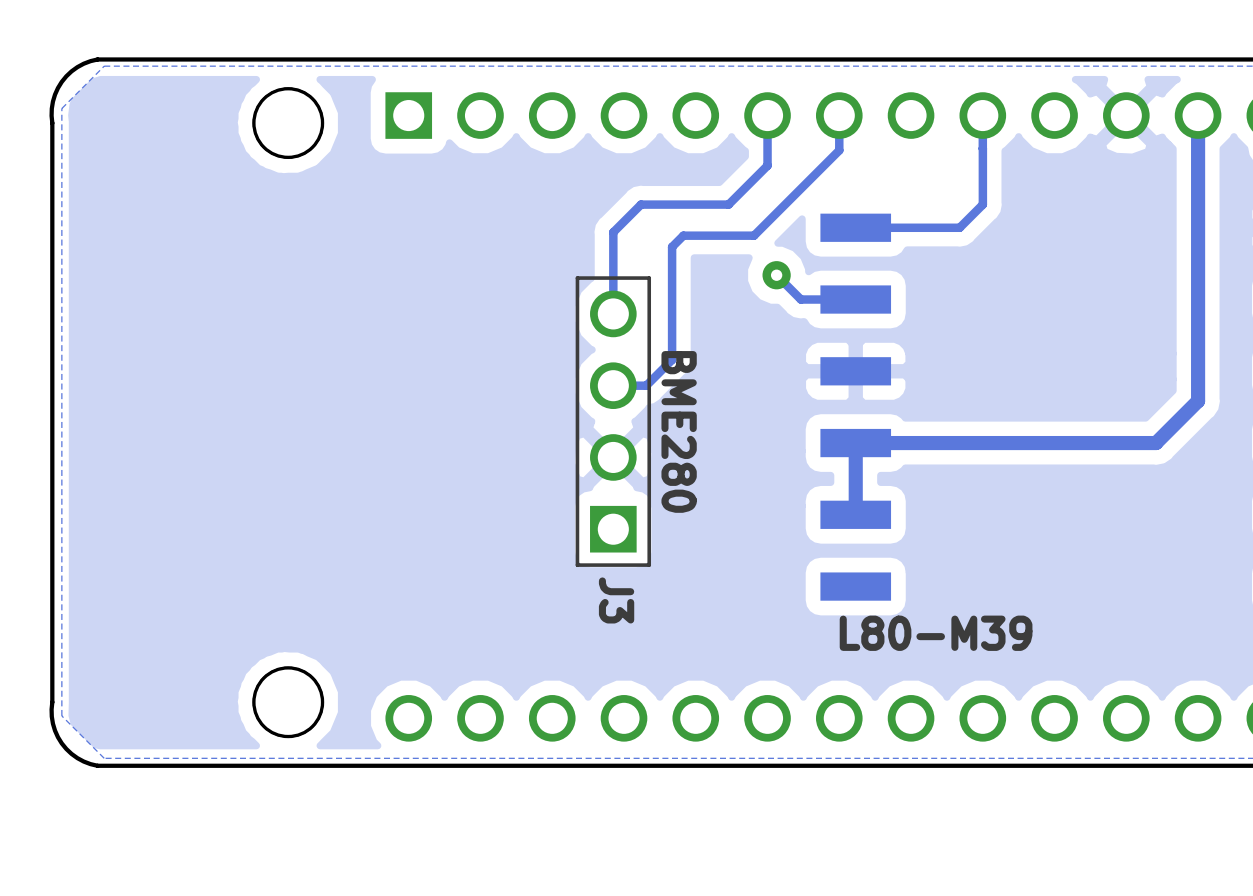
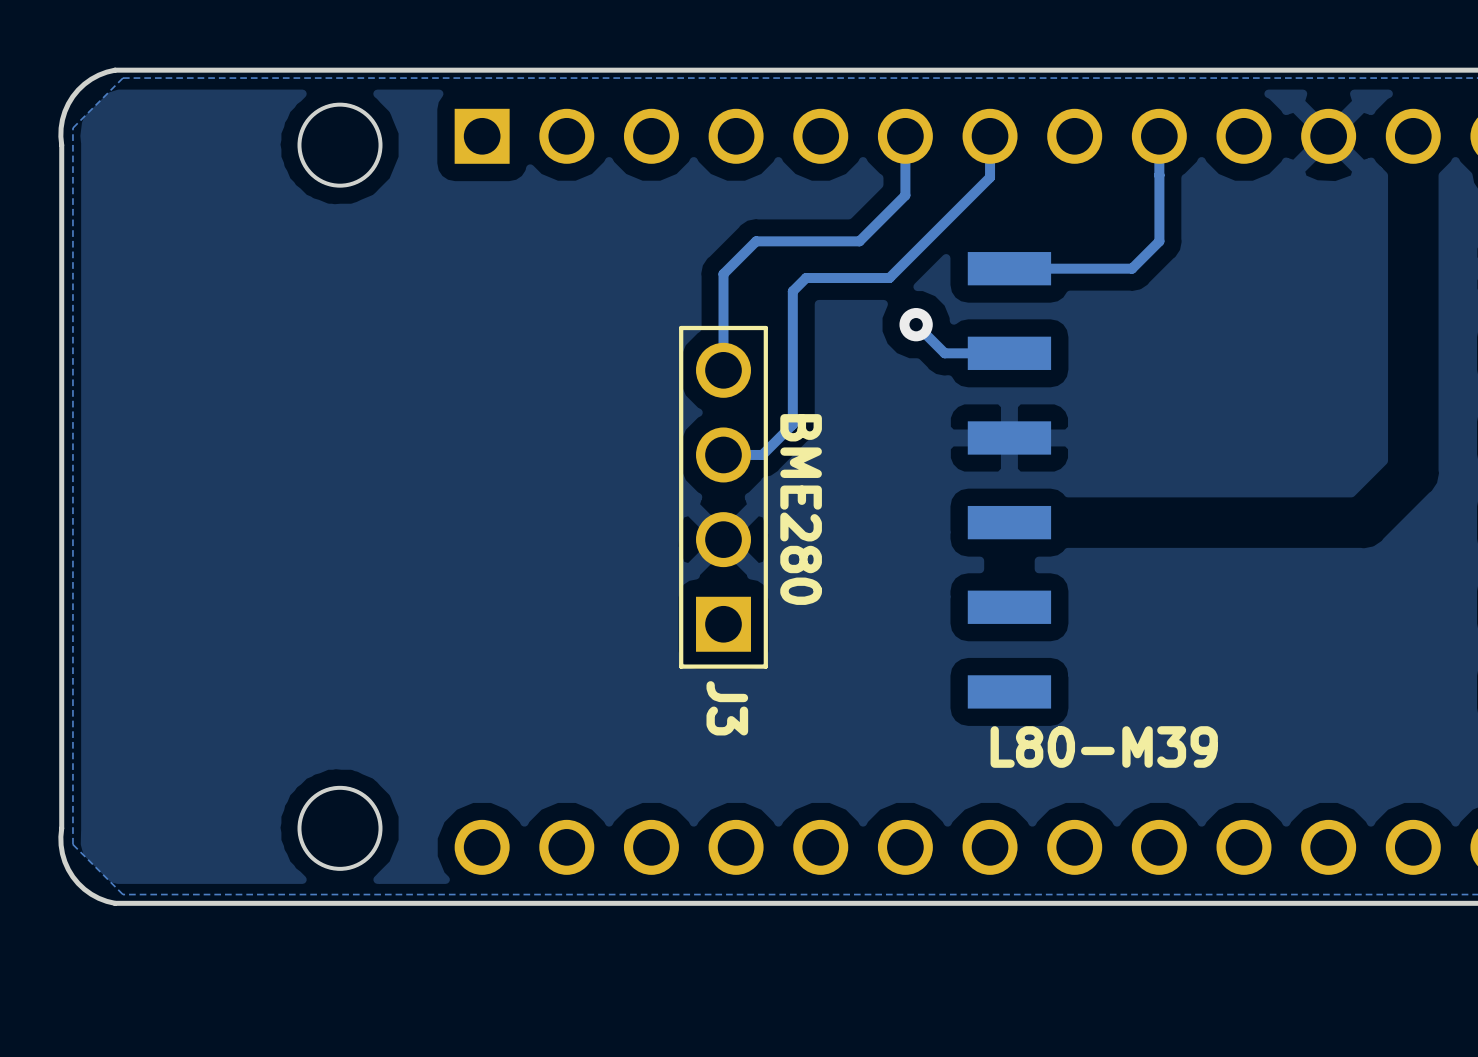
track: (1198, 115) (1198, 401) (1156, 443) (855, 443) (855, 514) -> none

